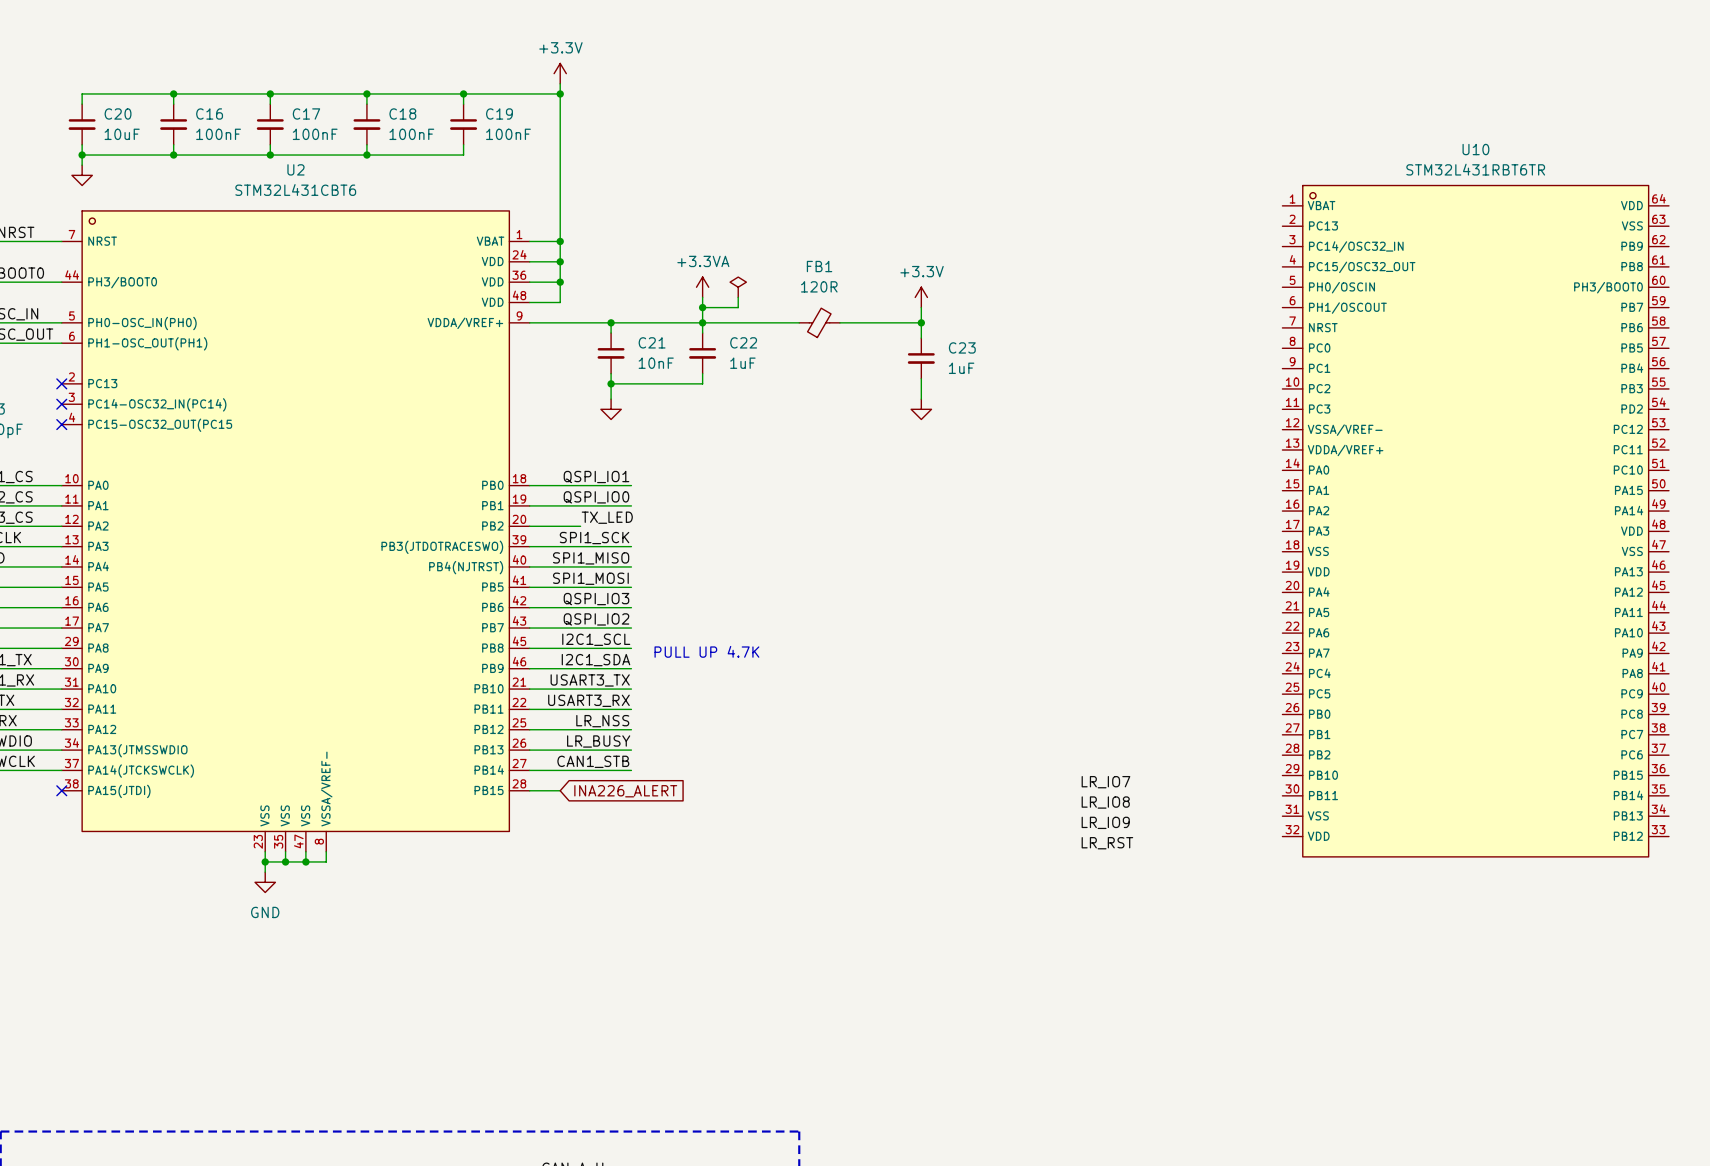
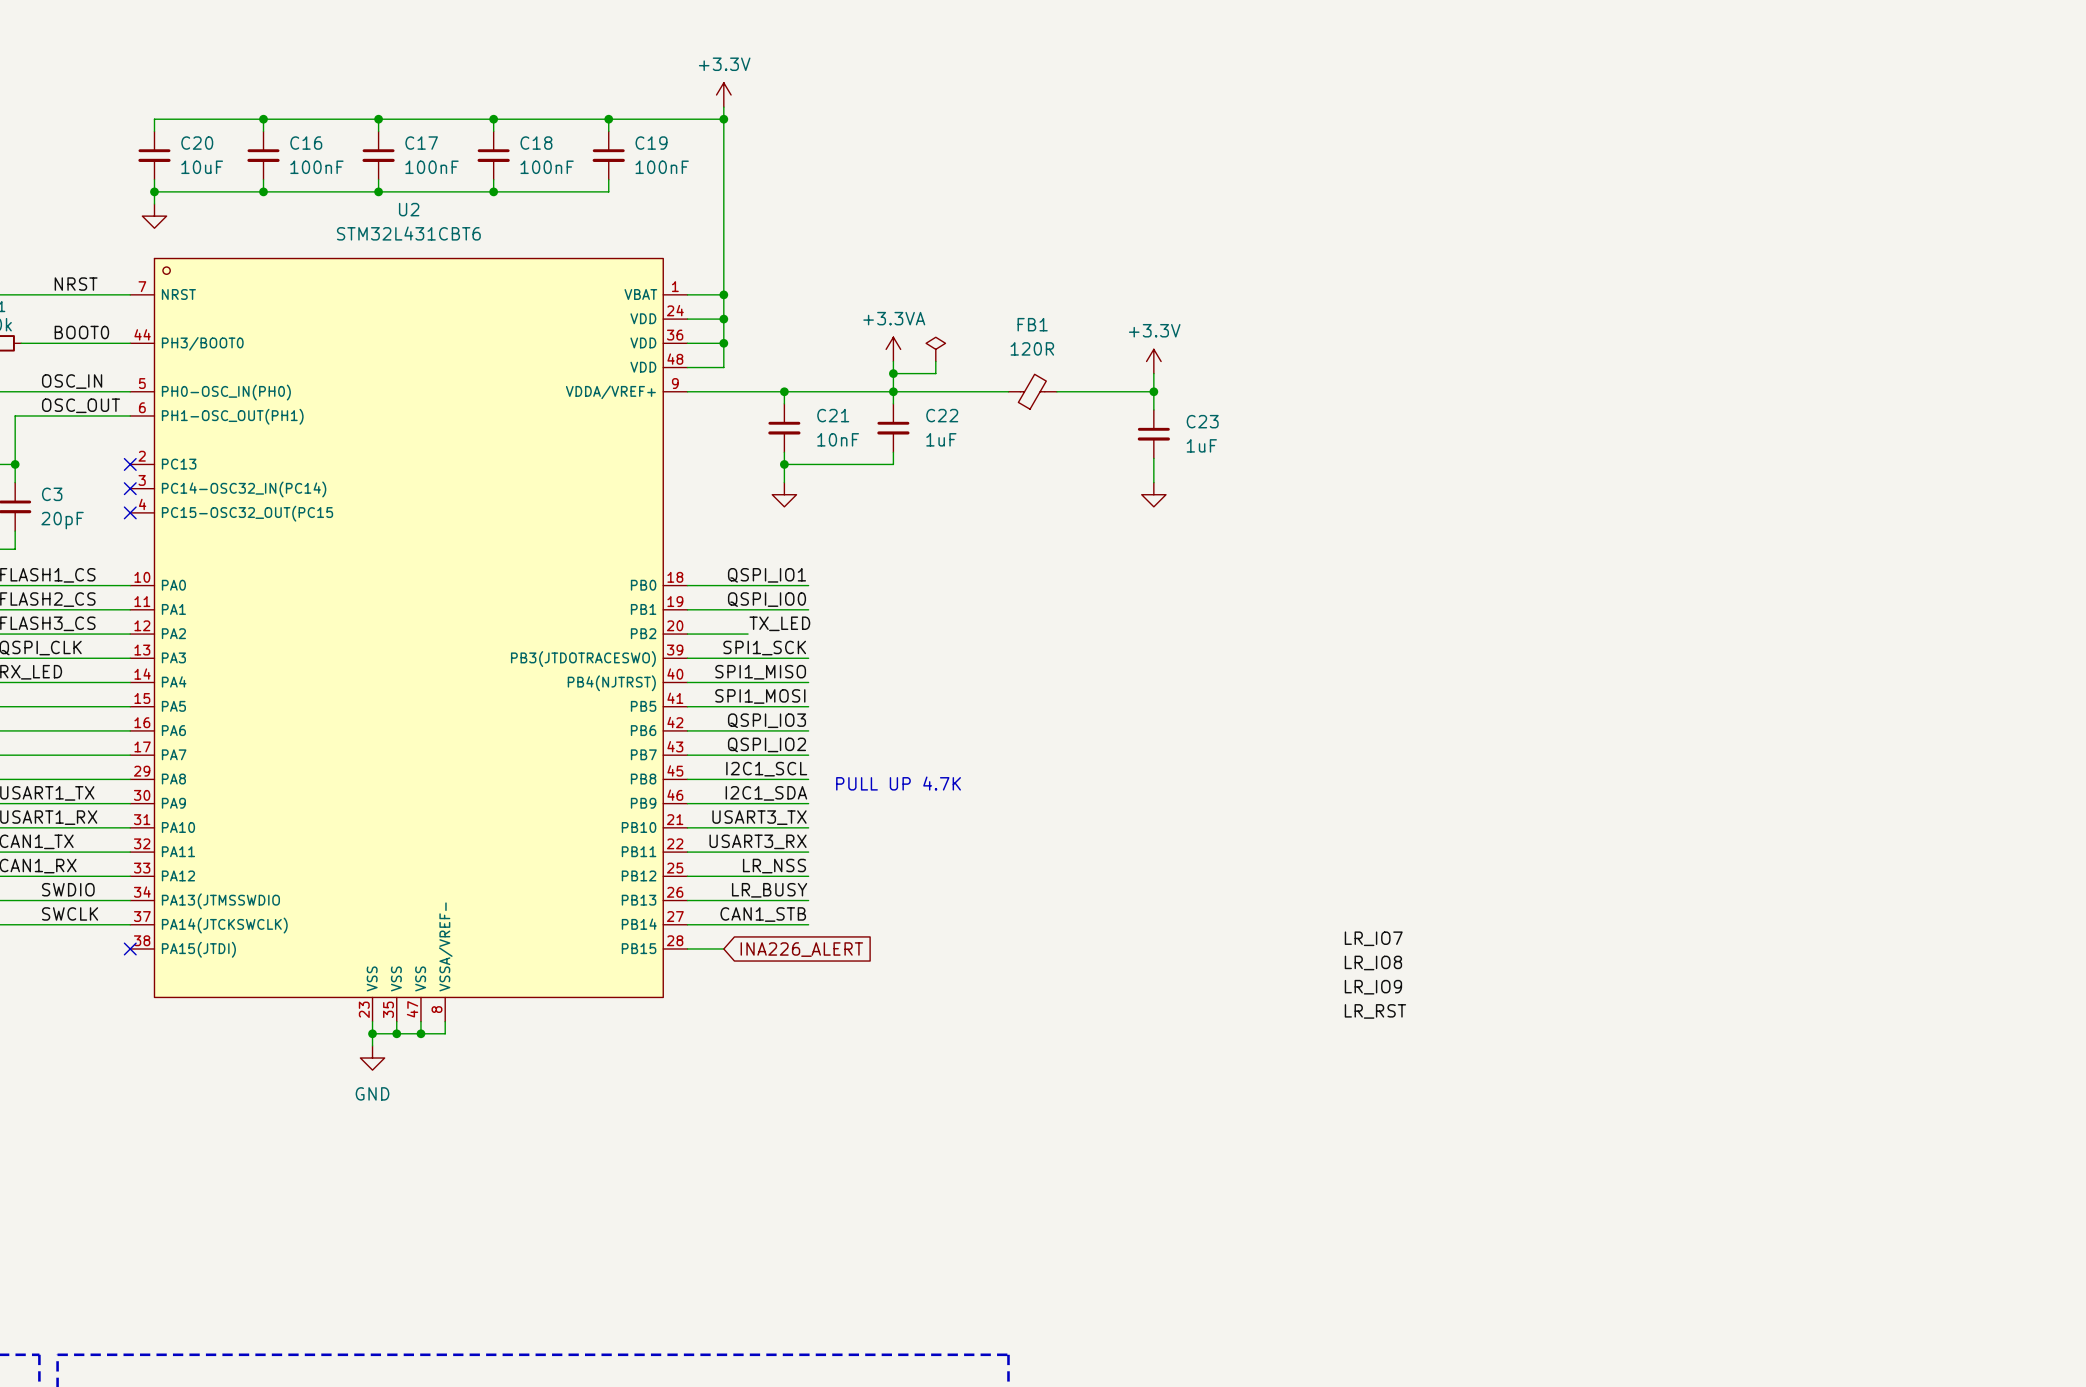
U10: STM32L431RBT6TR (1475, 521) -> none

